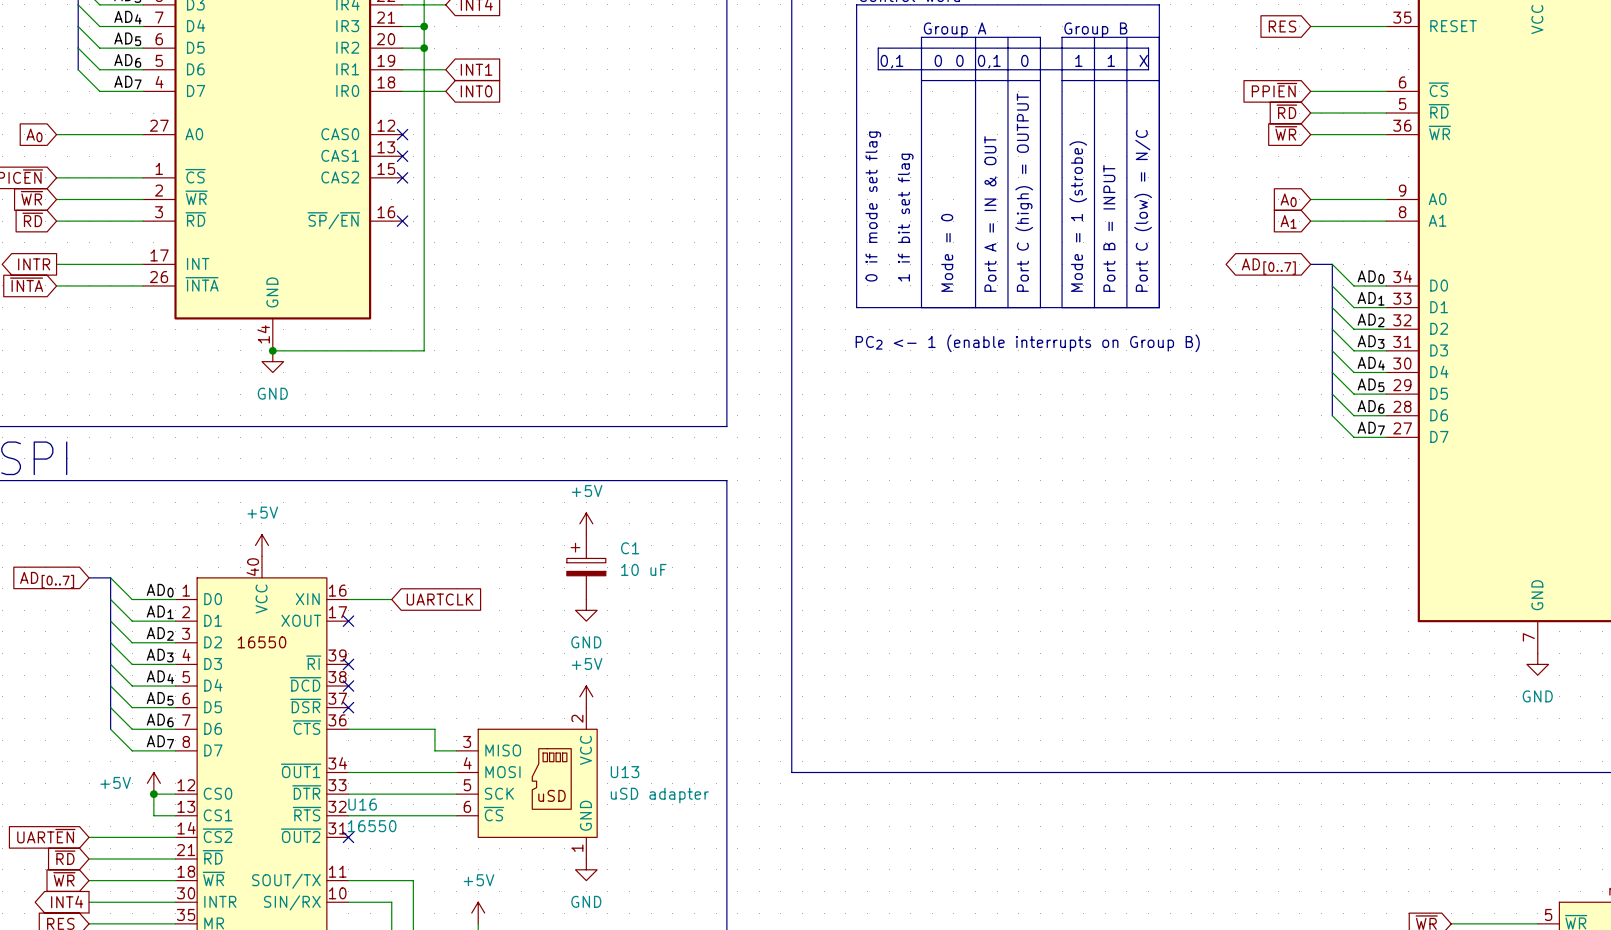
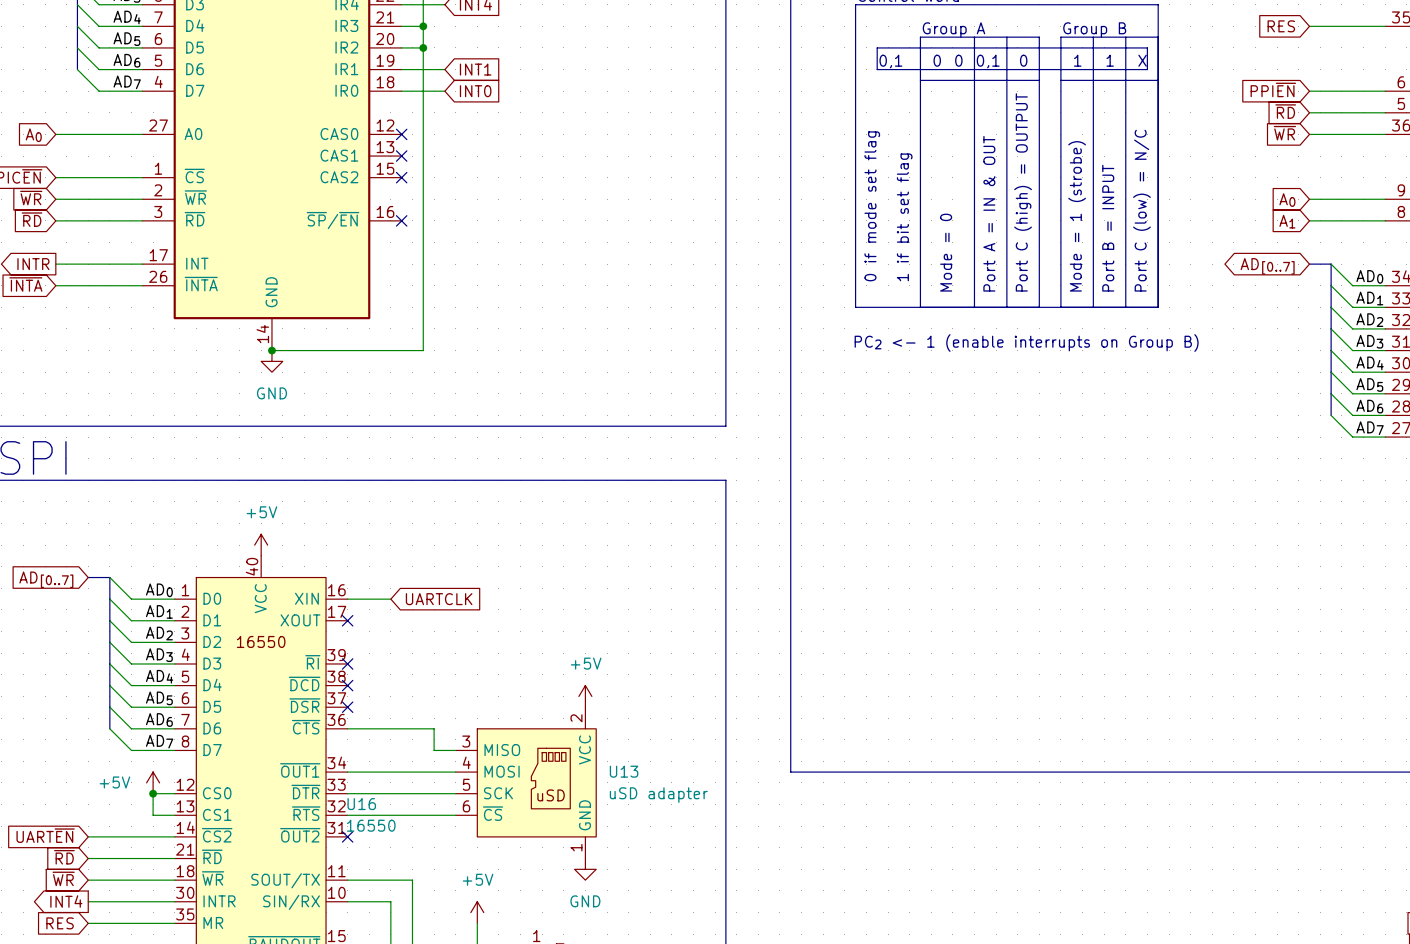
power symbol: +5V (586, 523) -> none
C1: 10 uF (586, 567) -> none
power symbol: GND (586, 610) -> none

